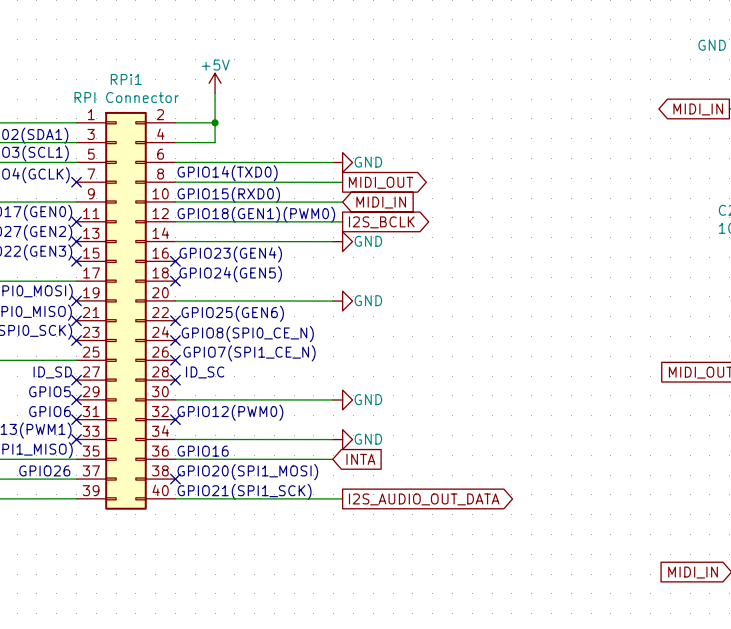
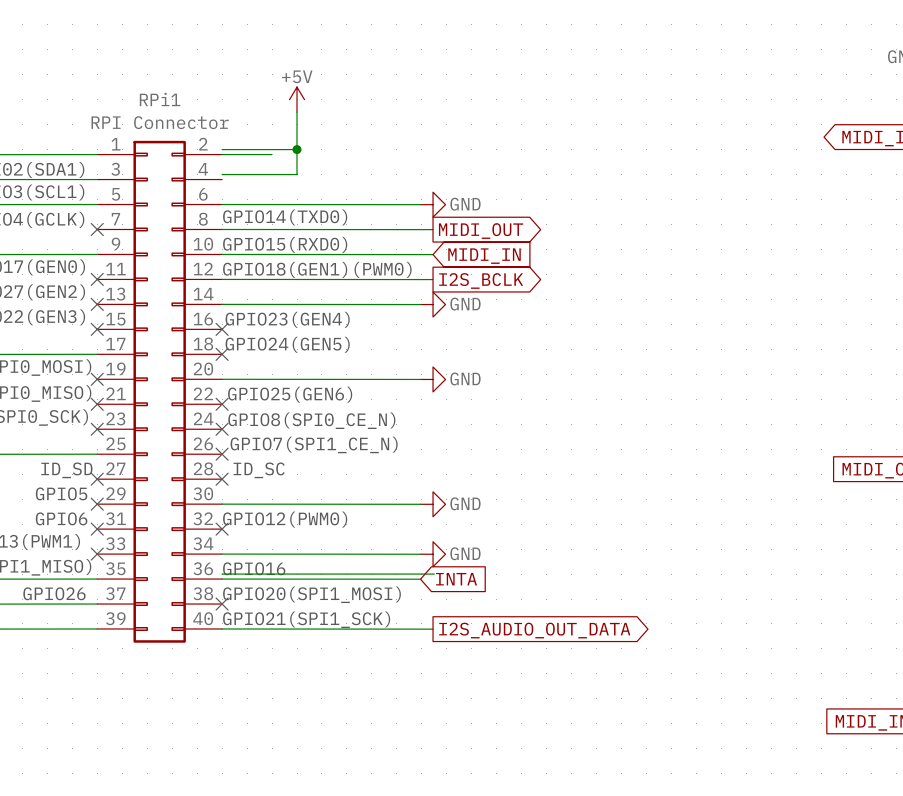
power symbol position: +5V (215, 83) -> +5V (297, 99)
wire: none -> (297, 112) (297, 174) (222, 174)
wire: (215, 93) (215, 142) (175, 142) -> none
wire: none -> (222, 149) (297, 149)
junction position: (215, 122) -> (297, 149)
wire: none -> (222, 574) (434, 574)

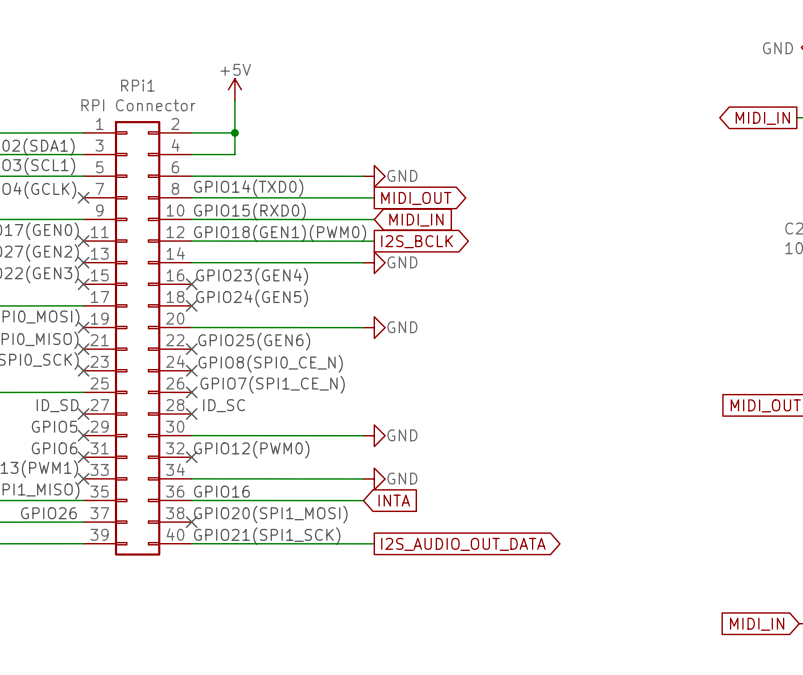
power symbol position: +5V (297, 99) -> +5V (234, 89)
wire: (297, 112) (297, 174) (222, 174) -> none
wire: none -> (234, 100) (234, 154) (191, 154)
wire: (222, 149) (297, 149) -> none
junction position: (297, 149) -> (234, 132)
wire: (222, 574) (434, 574) -> none

